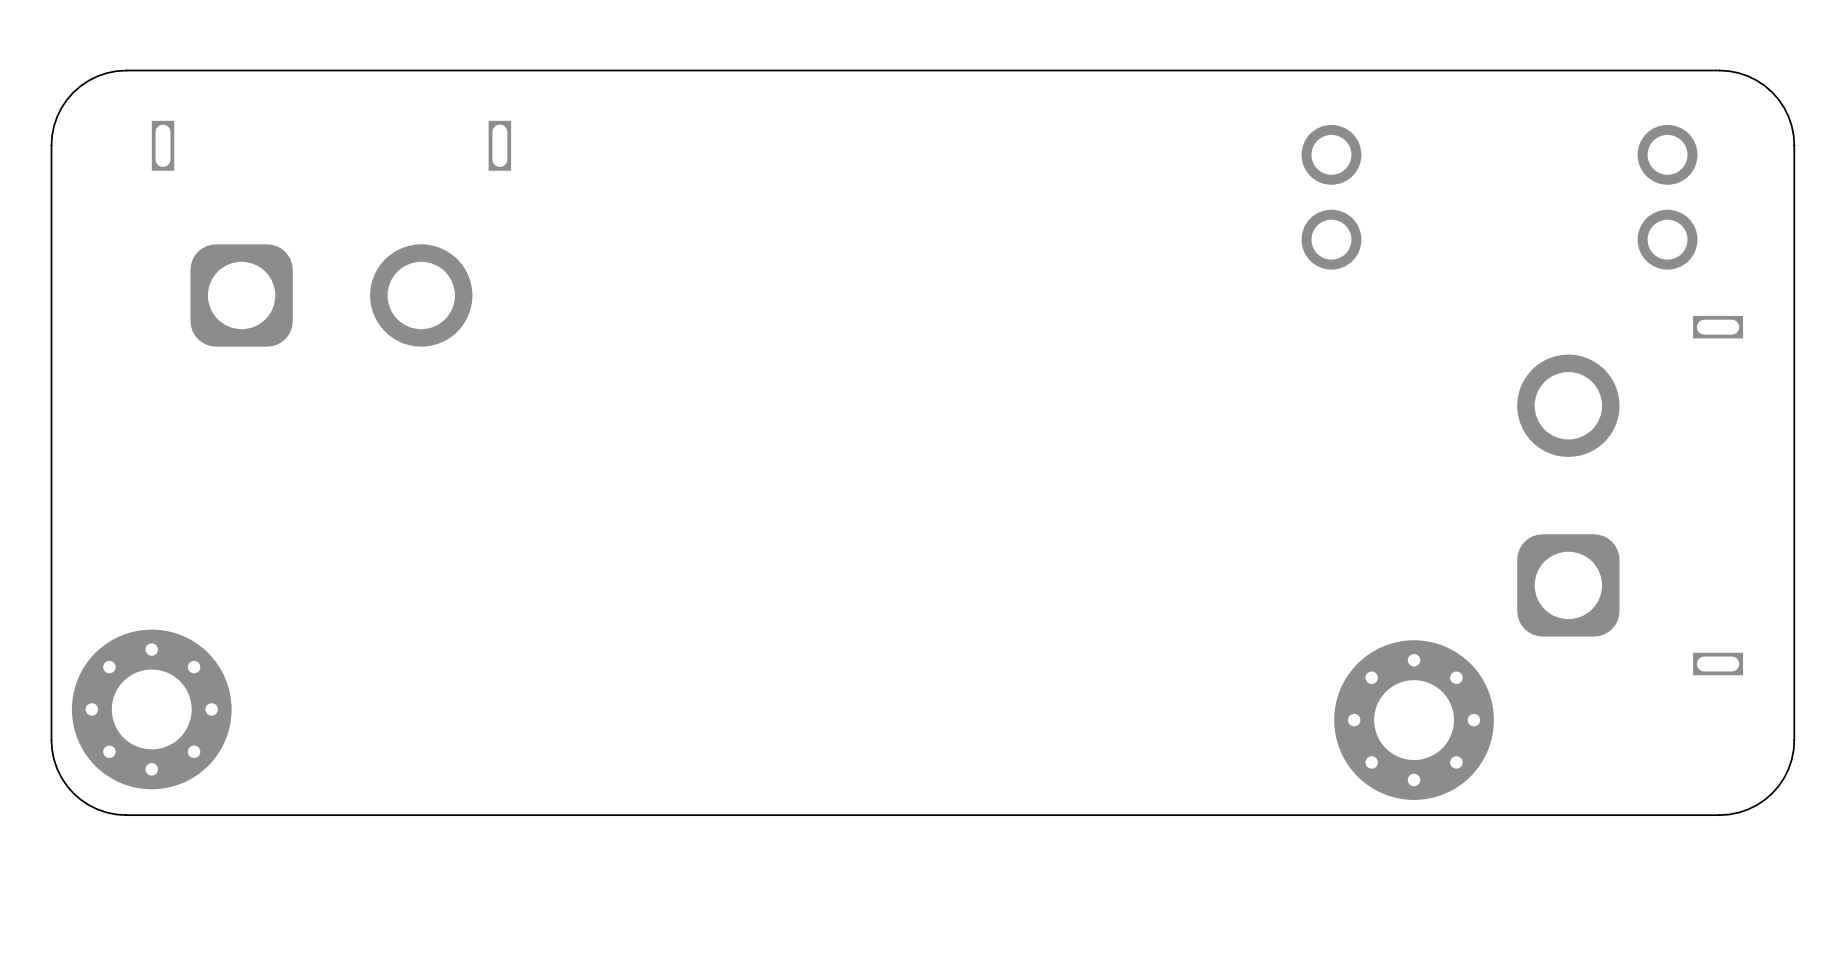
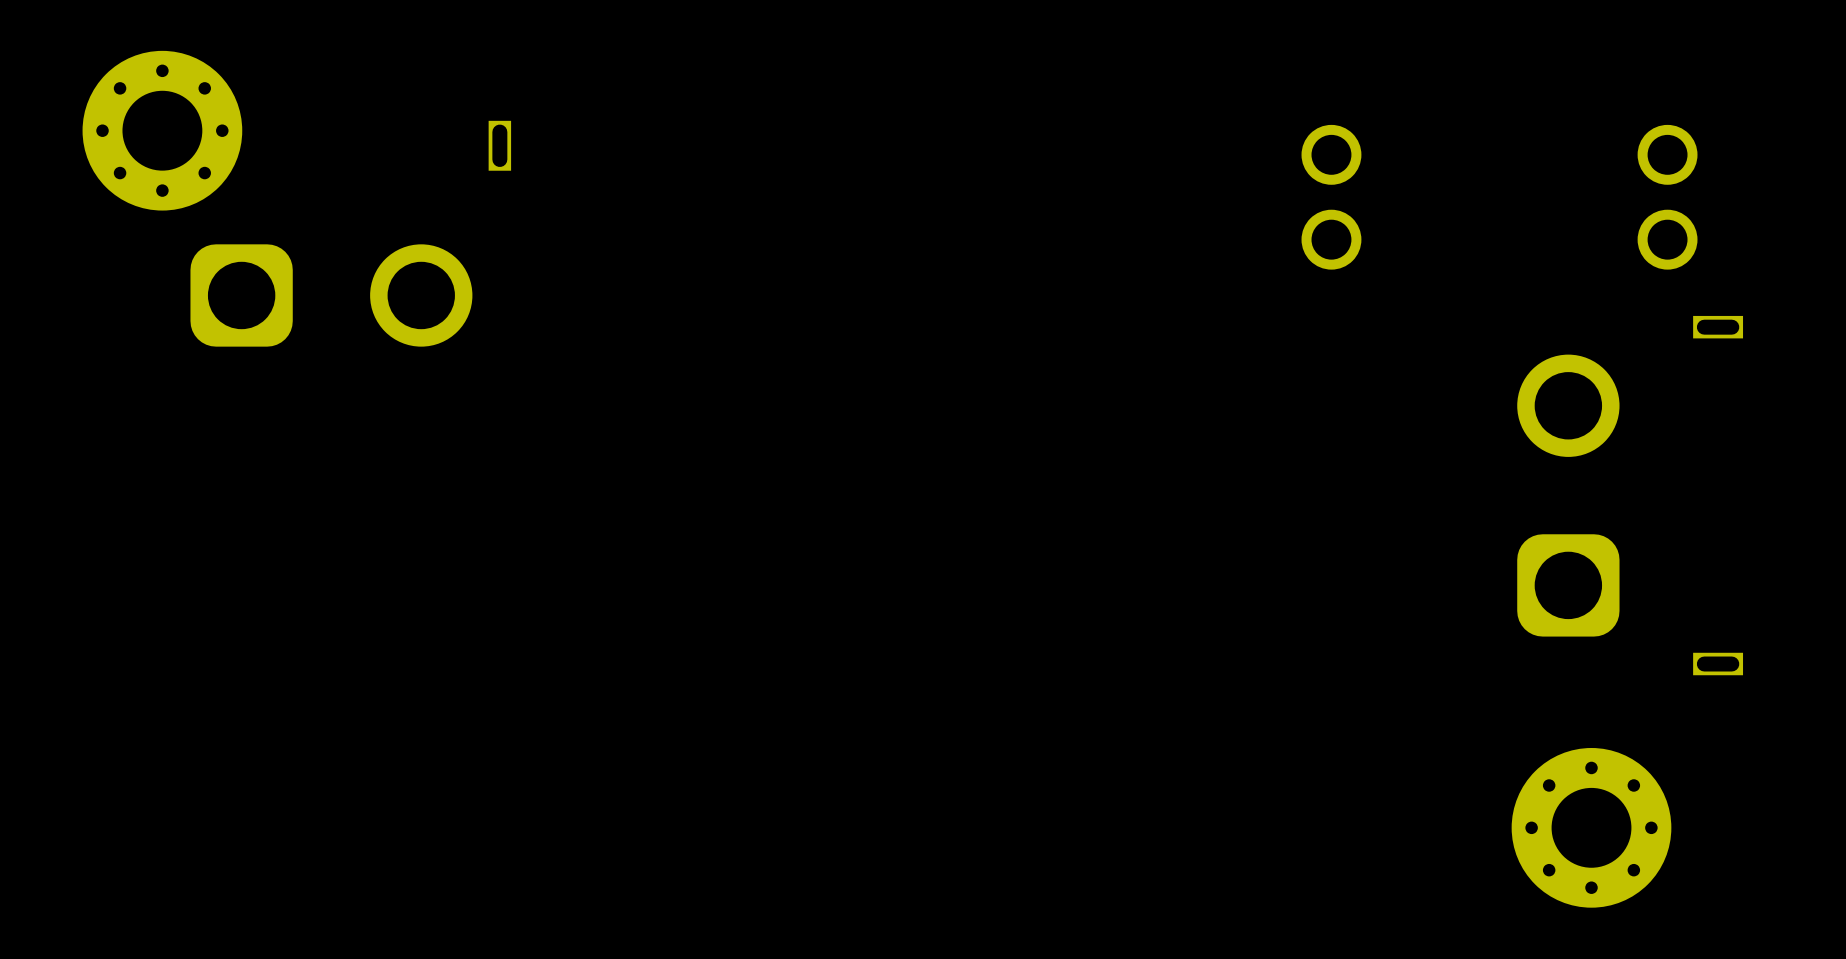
board edge: (1719, 70) (126, 70) (97, 76) (80, 85) (61, 107) (54, 125) (51, 145) (51, 740) (57, 768) (66, 785) (80, 799) (97, 809) (126, 815) (1719, 815) (1748, 809) (1765, 799) (1778, 785) (1788, 768) (1793, 750) (1794, 145) (1788, 116) (1772, 92) (1748, 76) (1719, 70) -> none
part position: (151, 709) -> (162, 130)
part position: (1414, 720) -> (1591, 827)

